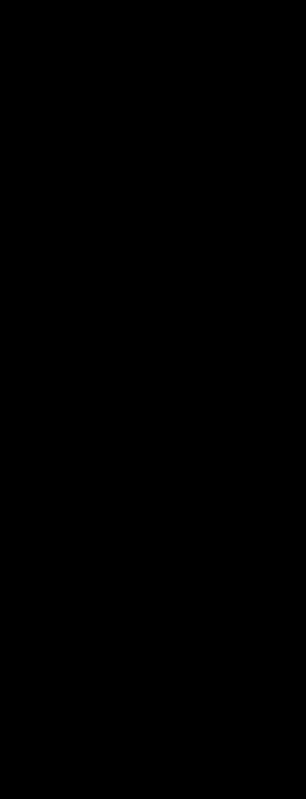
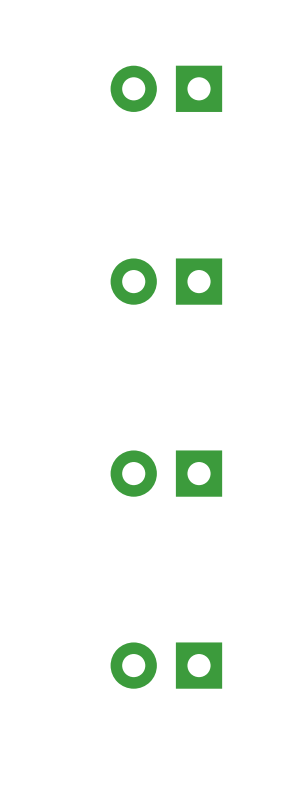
part: none -> (166, 88)
part: none -> (166, 281)
part: none -> (166, 473)
part: none -> (166, 665)

